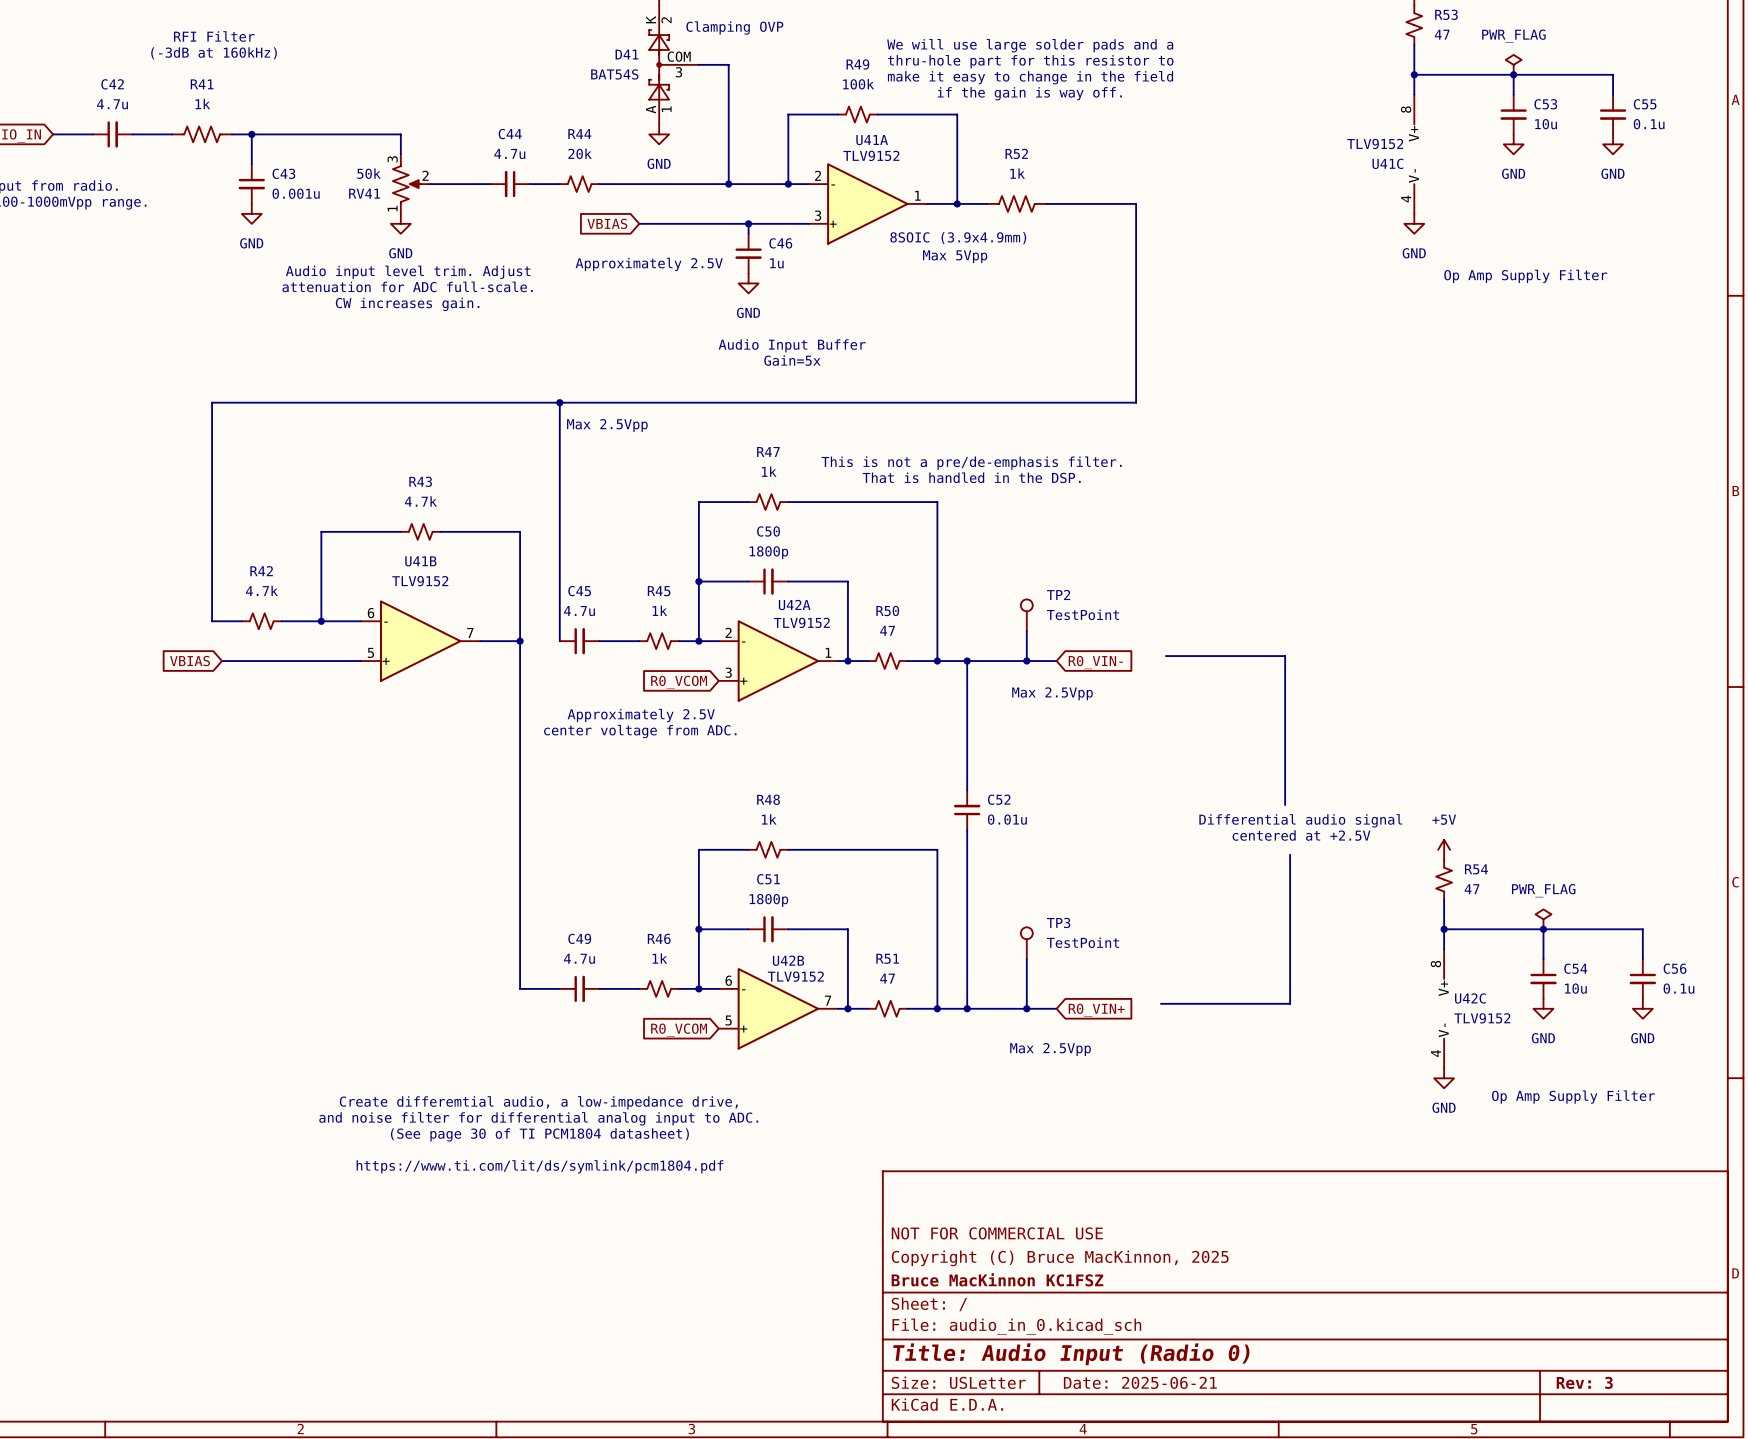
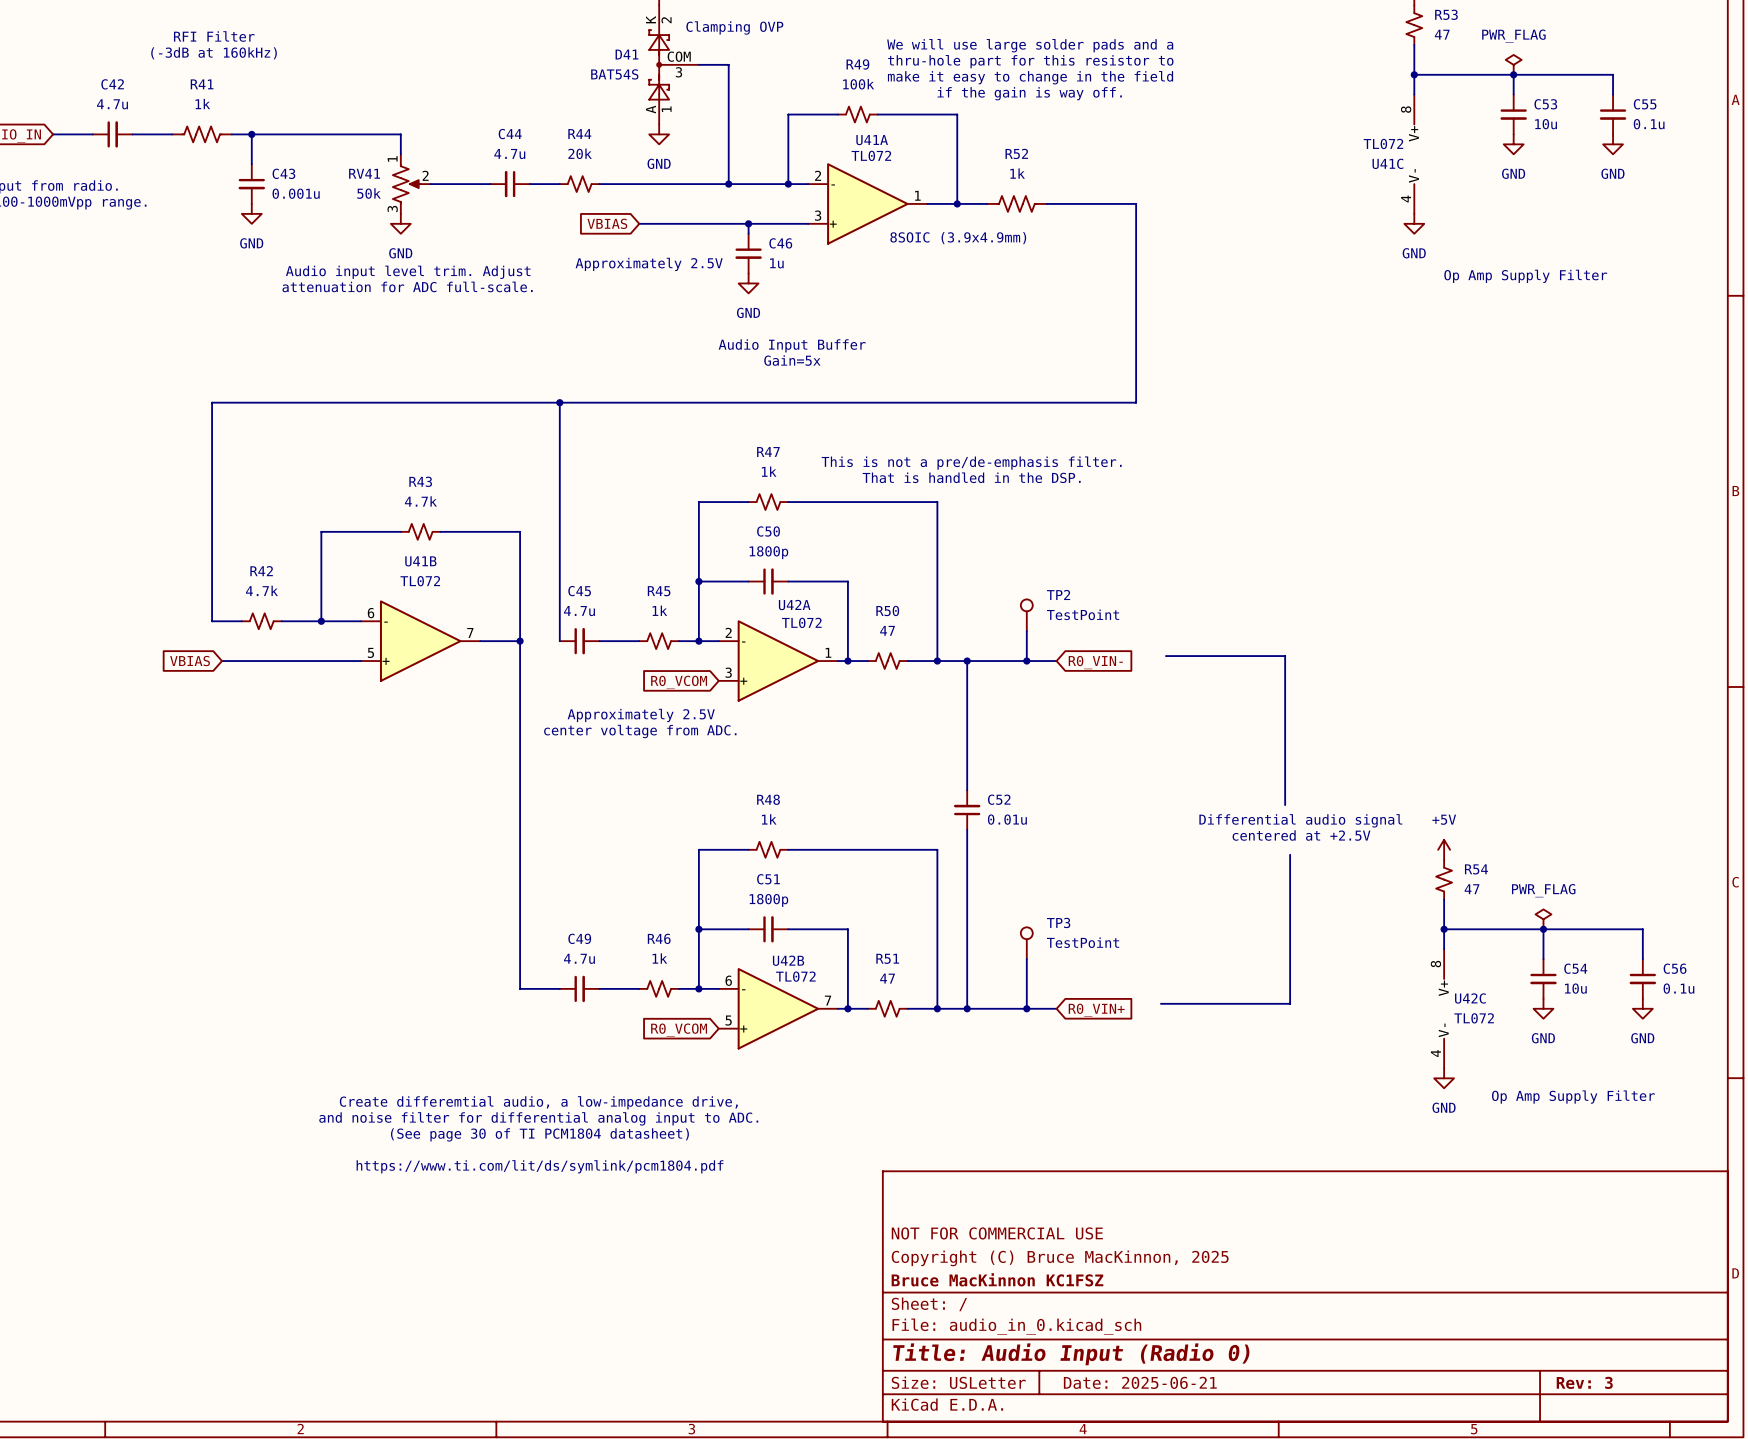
U41C value: TLV9152 (1375, 143) -> TL072 (1383, 143)
U41A value: TLV9152 (871, 155) -> TL072 (871, 155)
RV41 flip: as is (406, 184) -> up-down (406, 184)
text: Max 5Vpp (955, 256) -> none
text: CW increases gain. (407, 304) -> none
text: Max 2.5Vpp (607, 425) -> none
U41B value: TLV9152 (420, 581) -> TL072 (420, 581)
U42A value: TLV9152 (801, 622) -> TL072 (801, 622)
text: Max 2.5Vpp (1052, 693) -> none
U42B value: TLV9152 (795, 976) -> TL072 (795, 976)
U42C value: TLV9152 (1482, 1018) -> TL072 (1474, 1018)
text: Max 2.5Vpp (1050, 1049) -> none

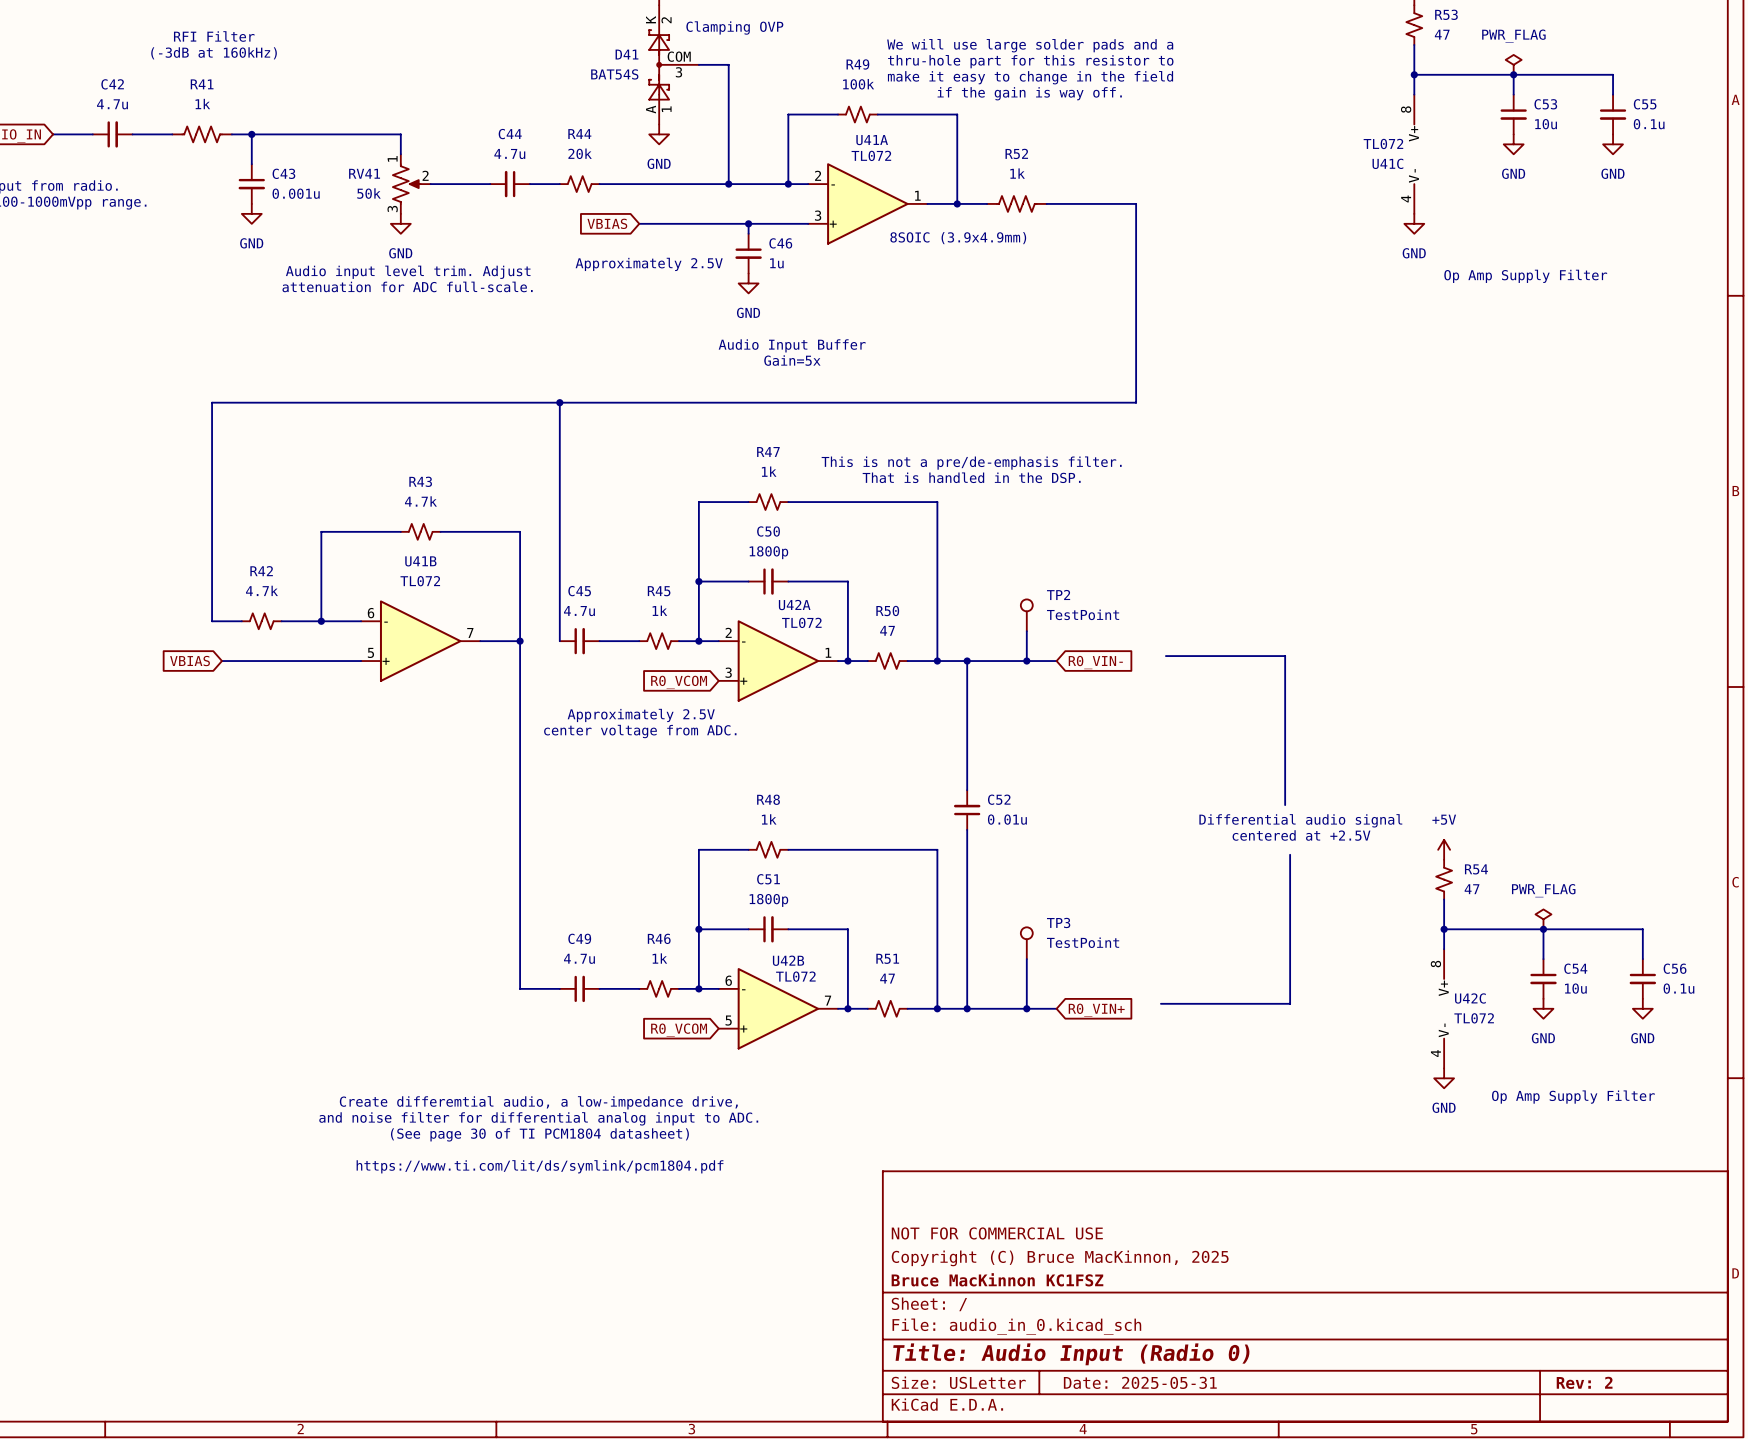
title block: Date: 2025-06-21 (1140, 1382) -> Date: 2025-05-31 (1140, 1382)
title block: Rev: 3 (1584, 1382) -> Rev: 2 (1584, 1382)

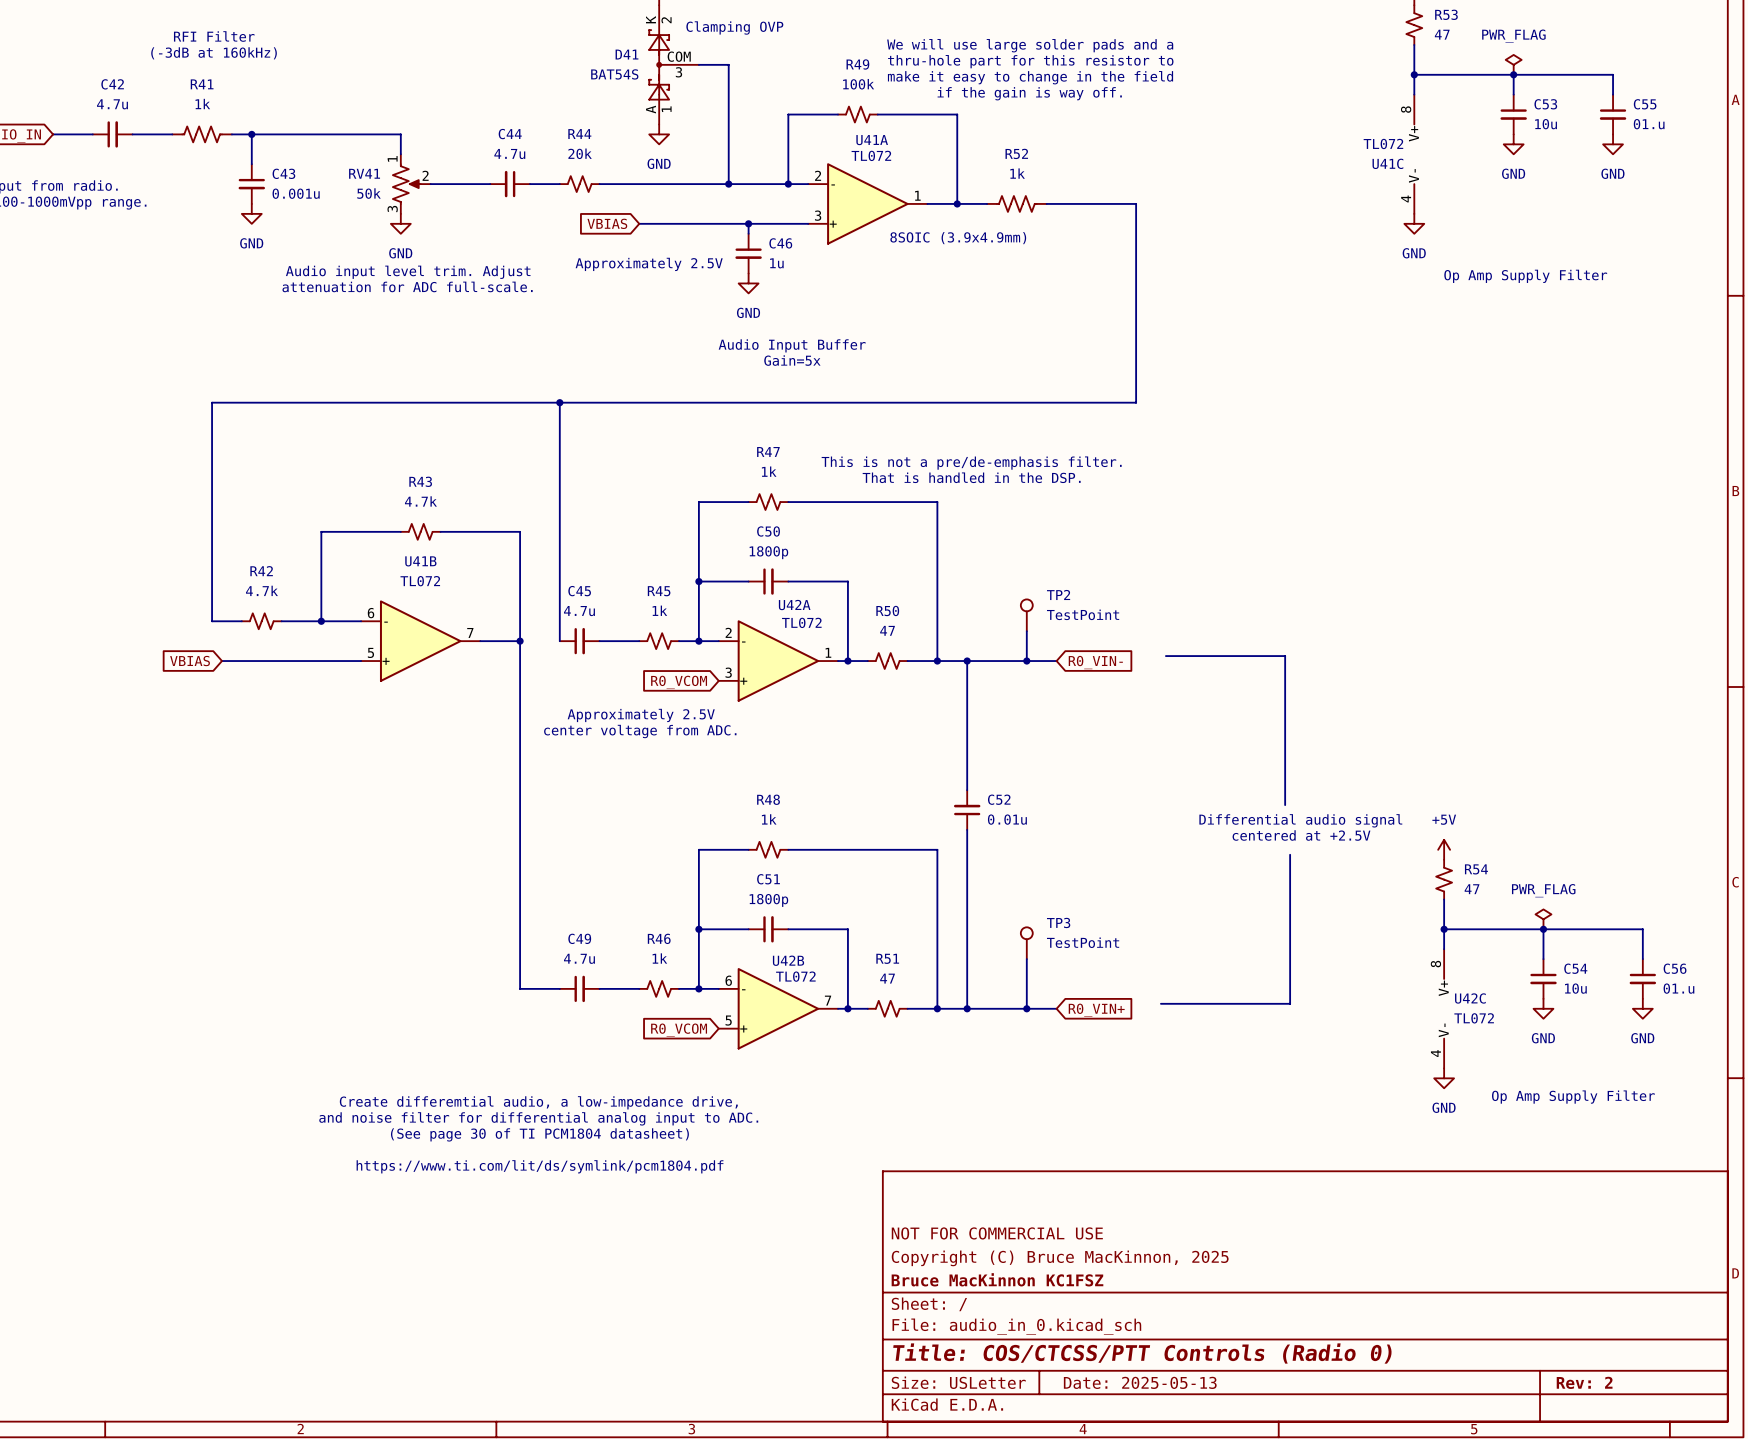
C55 value: 0.1u (1649, 124) -> 01.u (1649, 124)
C56 value: 0.1u (1678, 988) -> 01.u (1678, 988)
title block: Title: Audio Input (Radio 0) (1071, 1354) -> Title: COS/CTCSS/PTT Controls (Radio 0) (1142, 1353)
title block: Date: 2025-05-31 (1140, 1382) -> Date: 2025-05-13 (1140, 1382)

